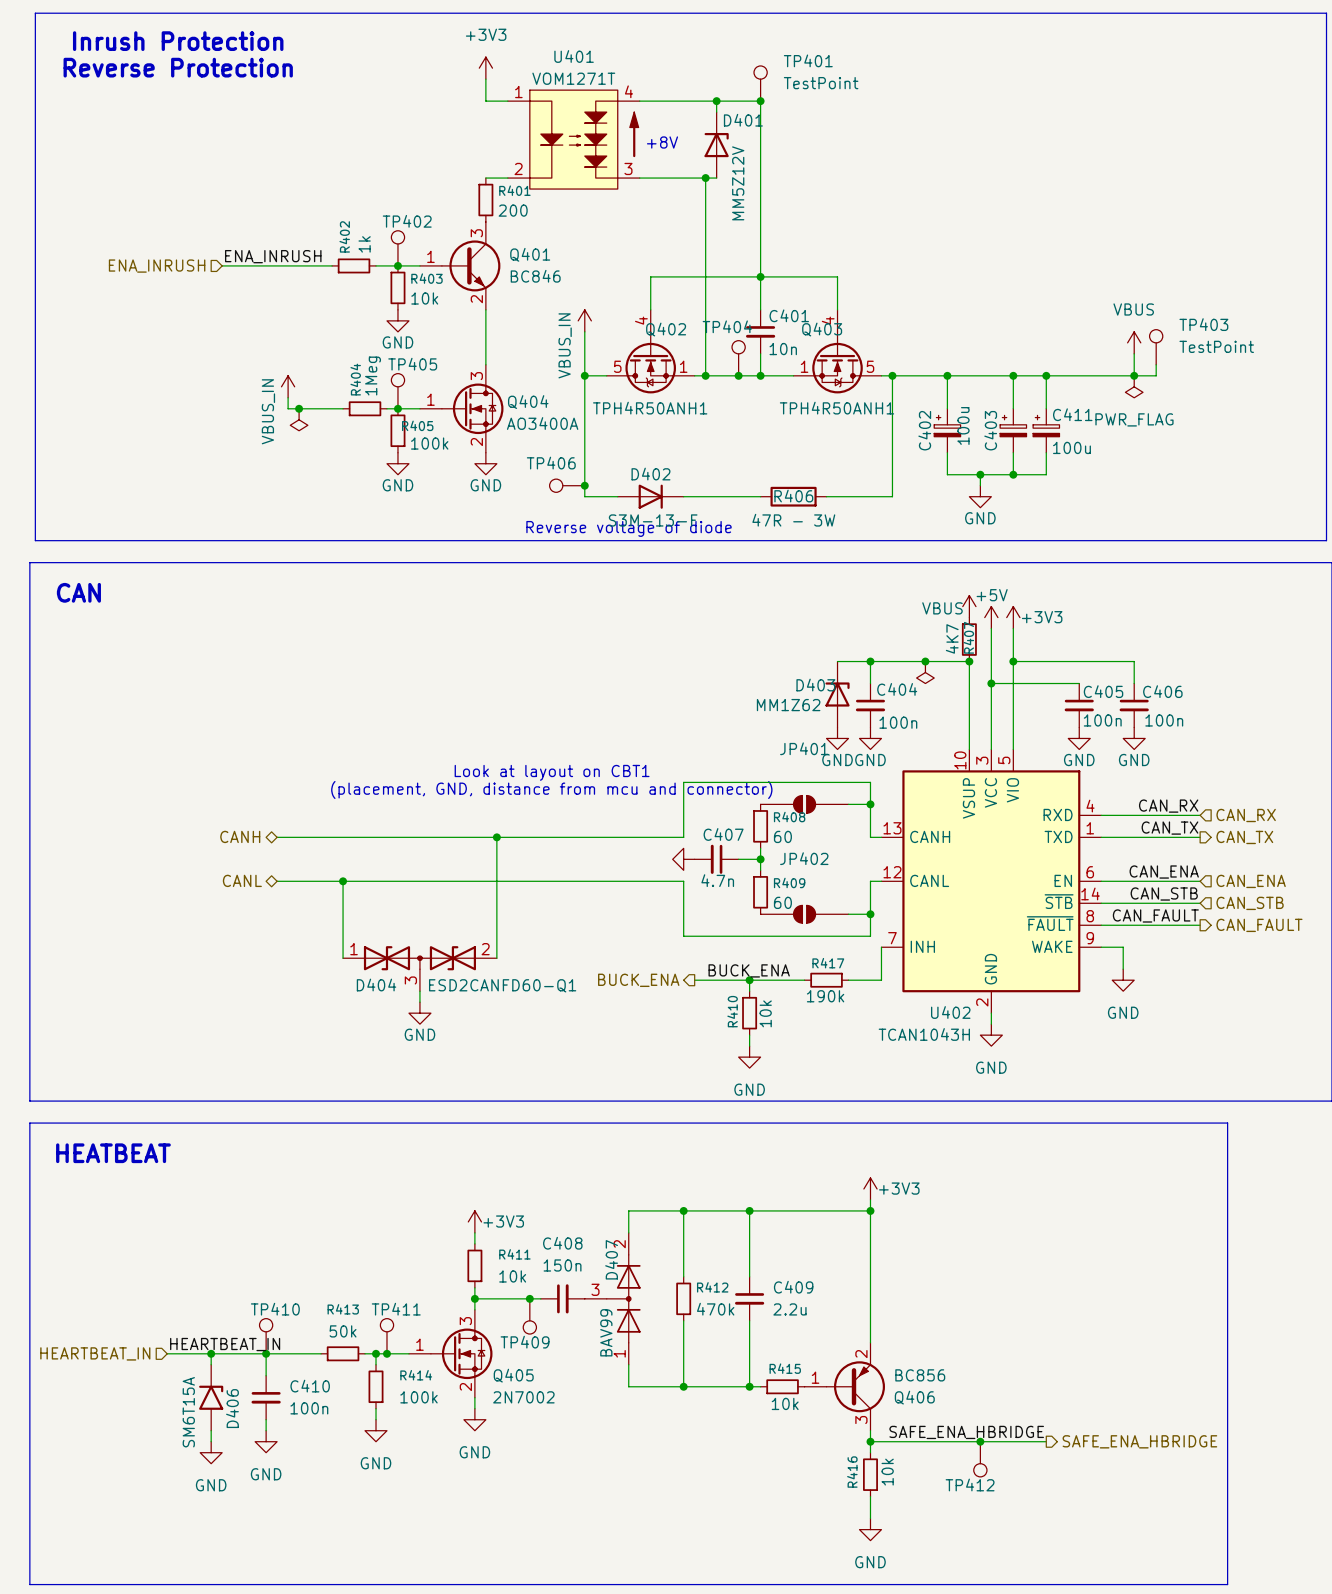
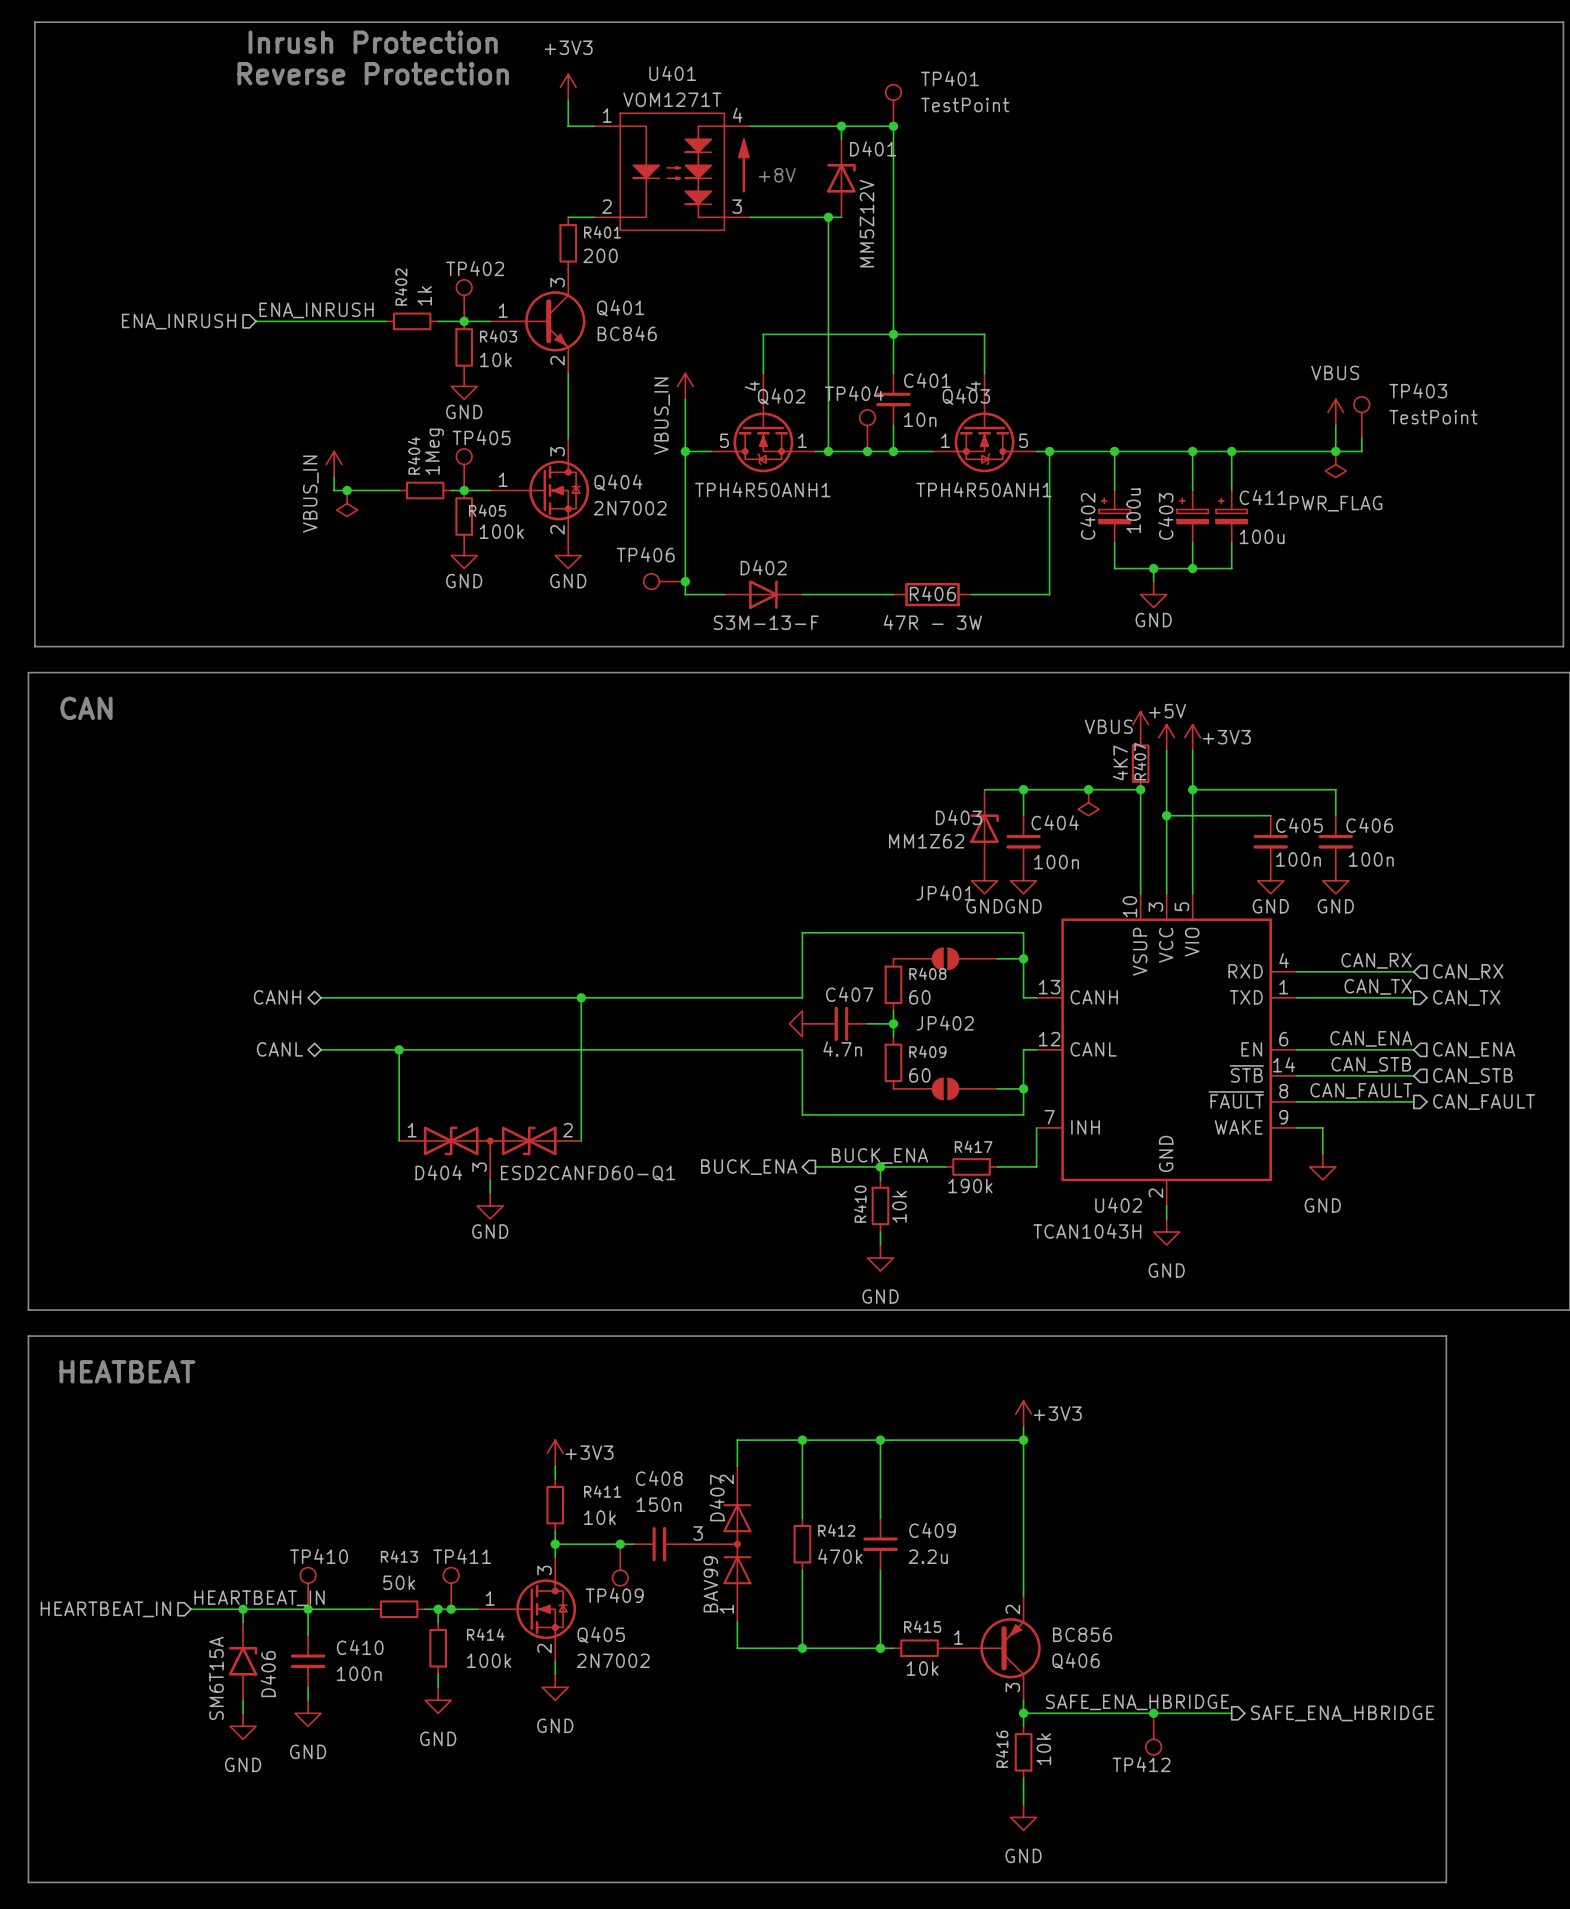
text position: Inrush Protection (178, 41) -> Inrush Protection (373, 42)
text position: Reverse Protection (178, 67) -> Reverse Protection (373, 73)
Q404 value: AO3400A (542, 423) -> 2N7002 (630, 508)
text: Reverse voltage of diode (629, 528) -> none
text: Look at layout on CBT1 (552, 772) -> none
text: (placement, GND, distance from mcu and connector) (551, 789) -> none

